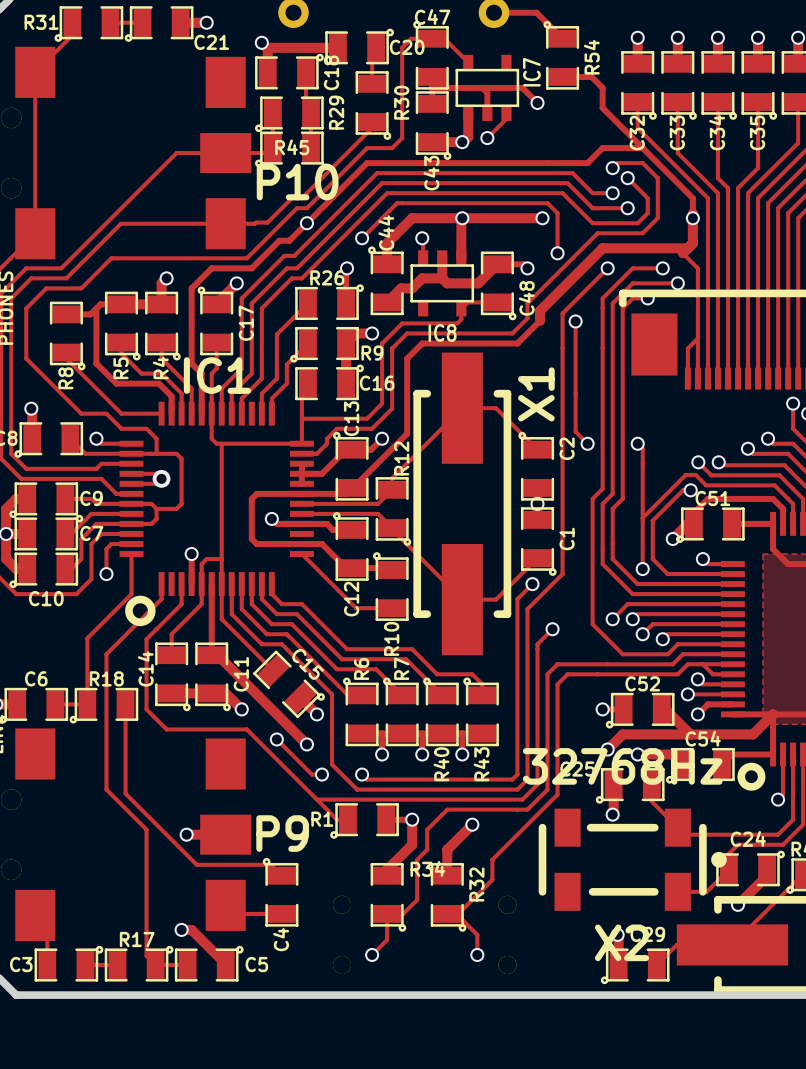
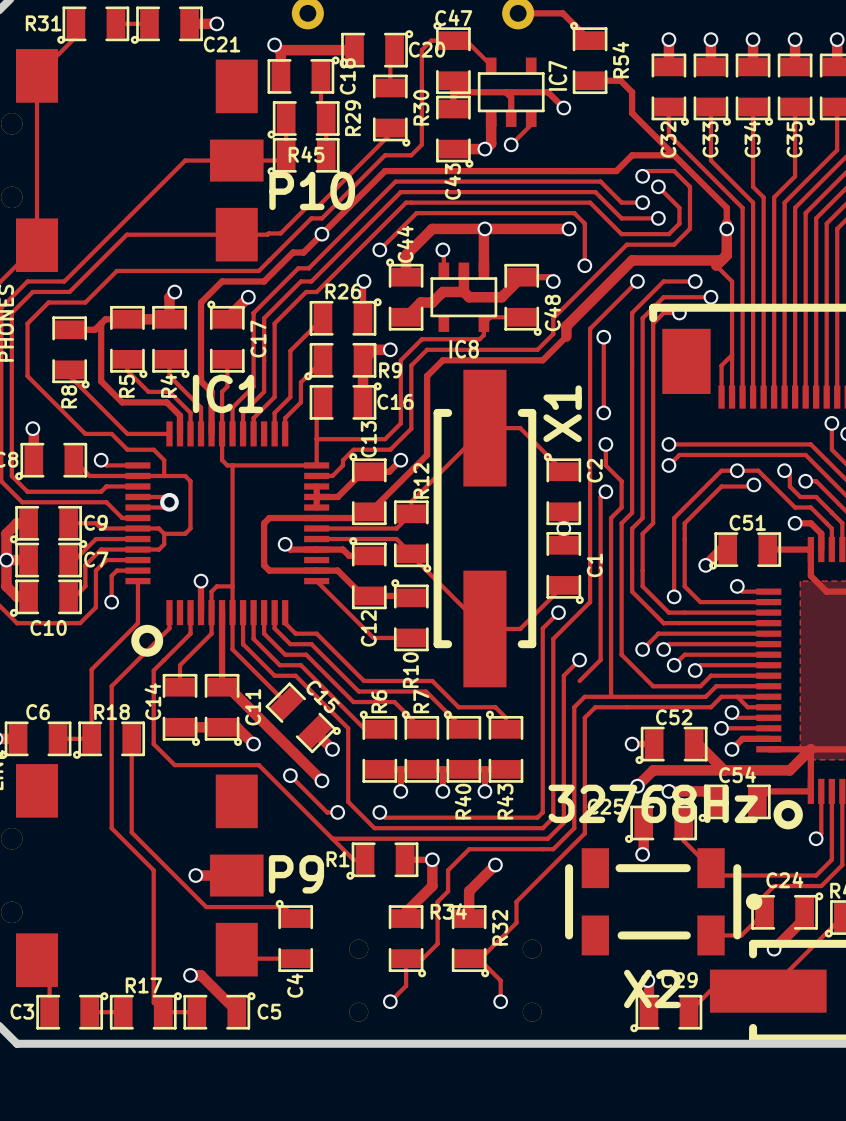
track: (575, 393) (575, 431) (587, 443) -> none
via: none -> (603, 412)
track: none -> (605, 444) (605, 465) (621, 481) (621, 507) (611, 518) (611, 696)
via: none -> (605, 444)
via: none -> (668, 444)
track: (768, 438) (773, 443) (793, 443) -> (668, 444) (810, 444) (831, 465)
via position: (768, 438) -> (805, 481)
via: (587, 443) -> none
track: (637, 443) (642, 448) (642, 493) -> none
track: (747, 448) (753, 453) (788, 453) -> (668, 465) (679, 454) (805, 454) (826, 476)
track: (698, 462) (711, 475) (779, 475) -> (789, 470) (789, 486) (800, 496) (817, 498)
via position: (698, 462) -> (737, 470)
track: (718, 462) (721, 465) (784, 465) -> (805, 481) (816, 481) (822, 488)
track: none -> (605, 491) (600, 496) (600, 660) (579, 681)
via: none -> (605, 491)
track: (774, 485) (706, 485) (695, 475) (685, 475) (642, 517) -> (812, 509) (795, 507) (758, 470) (721, 470) (674, 518)
track: (690, 490) (683, 490) (652, 520) -> (753, 486) (721, 486) (684, 523) (684, 546)
via: (690, 490) -> none
track: (758, 498) (707, 498) (693, 513) (693, 523) -> none
via: none -> (795, 523)

